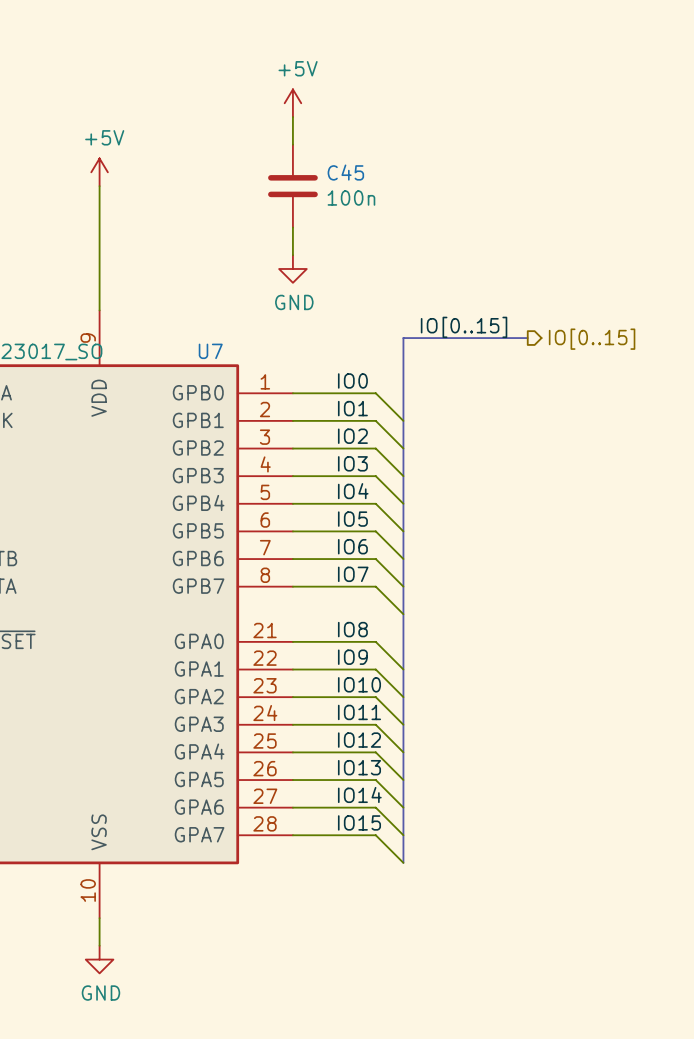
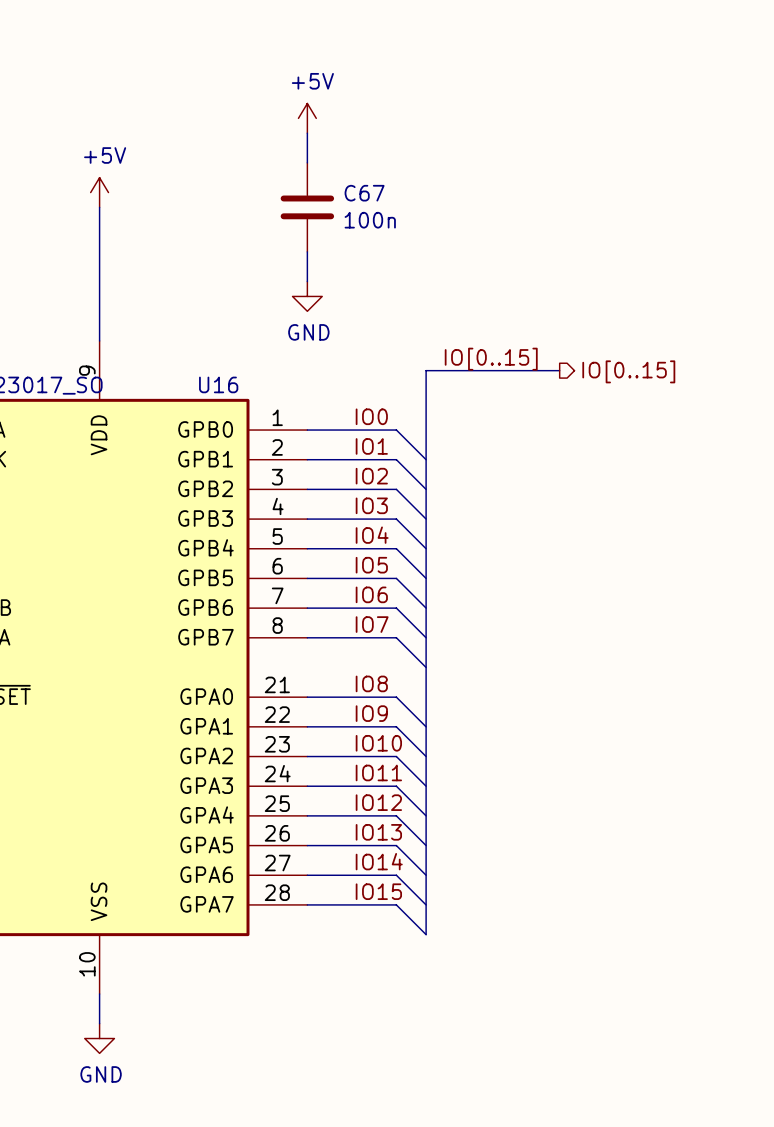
C45 name: C45 (345, 172) -> C67 (364, 193)
U7 name: U7 (210, 351) -> U16 (218, 384)

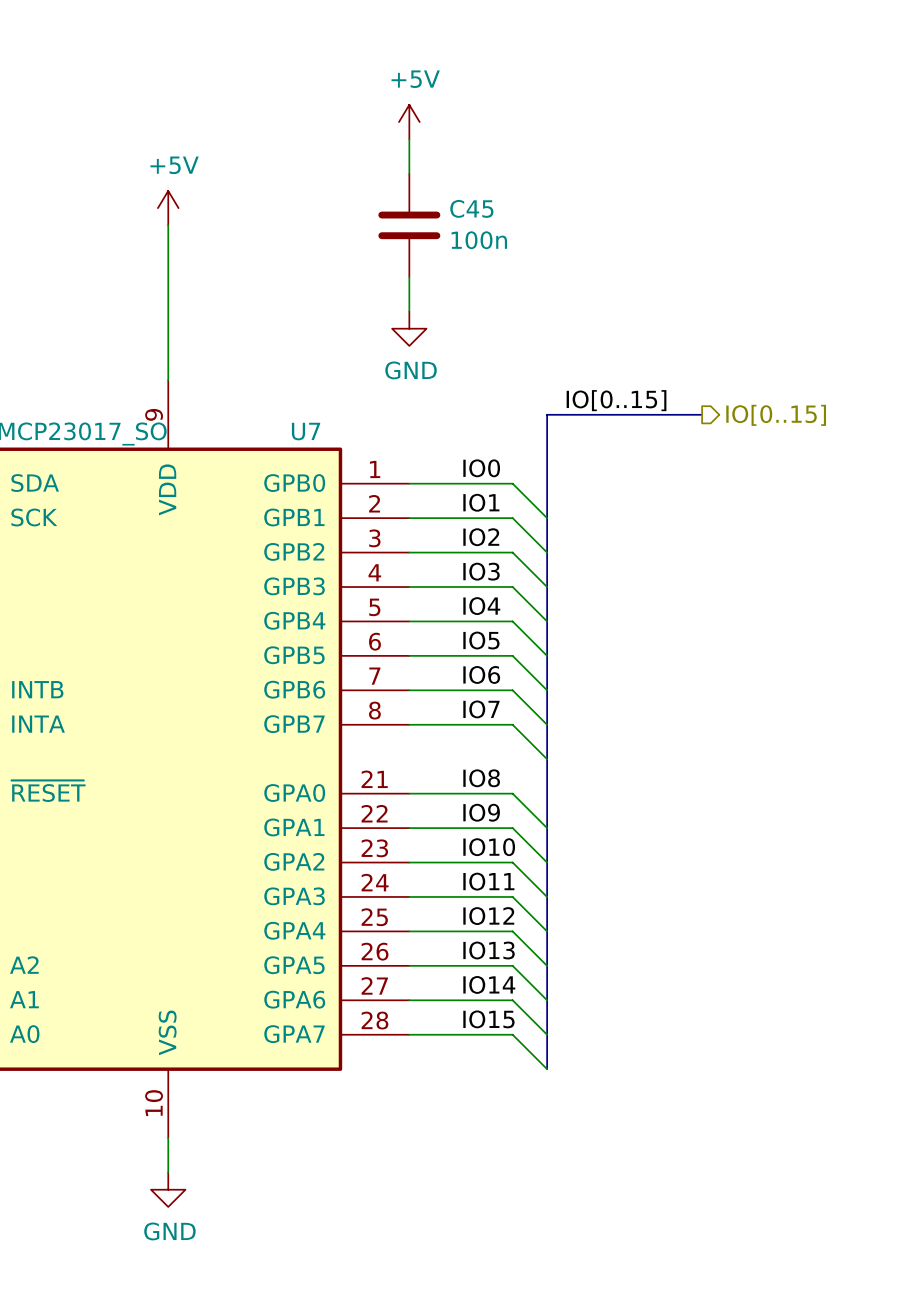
C67 name: C67 (364, 193) -> C45 (471, 208)
U16 name: U16 (218, 384) -> U7 (306, 431)

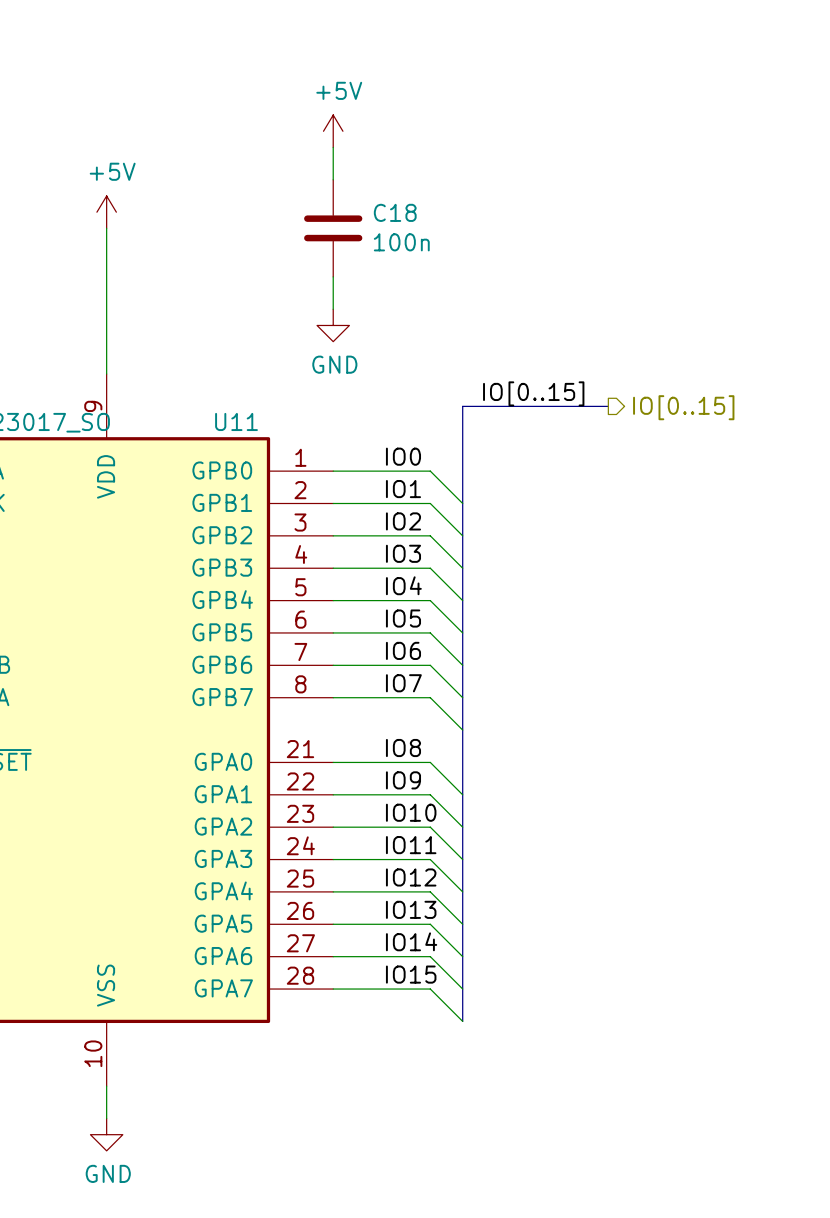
C45 name: C45 (471, 208) -> C18 (395, 212)
U7 name: U7 (306, 431) -> U11 (236, 421)

